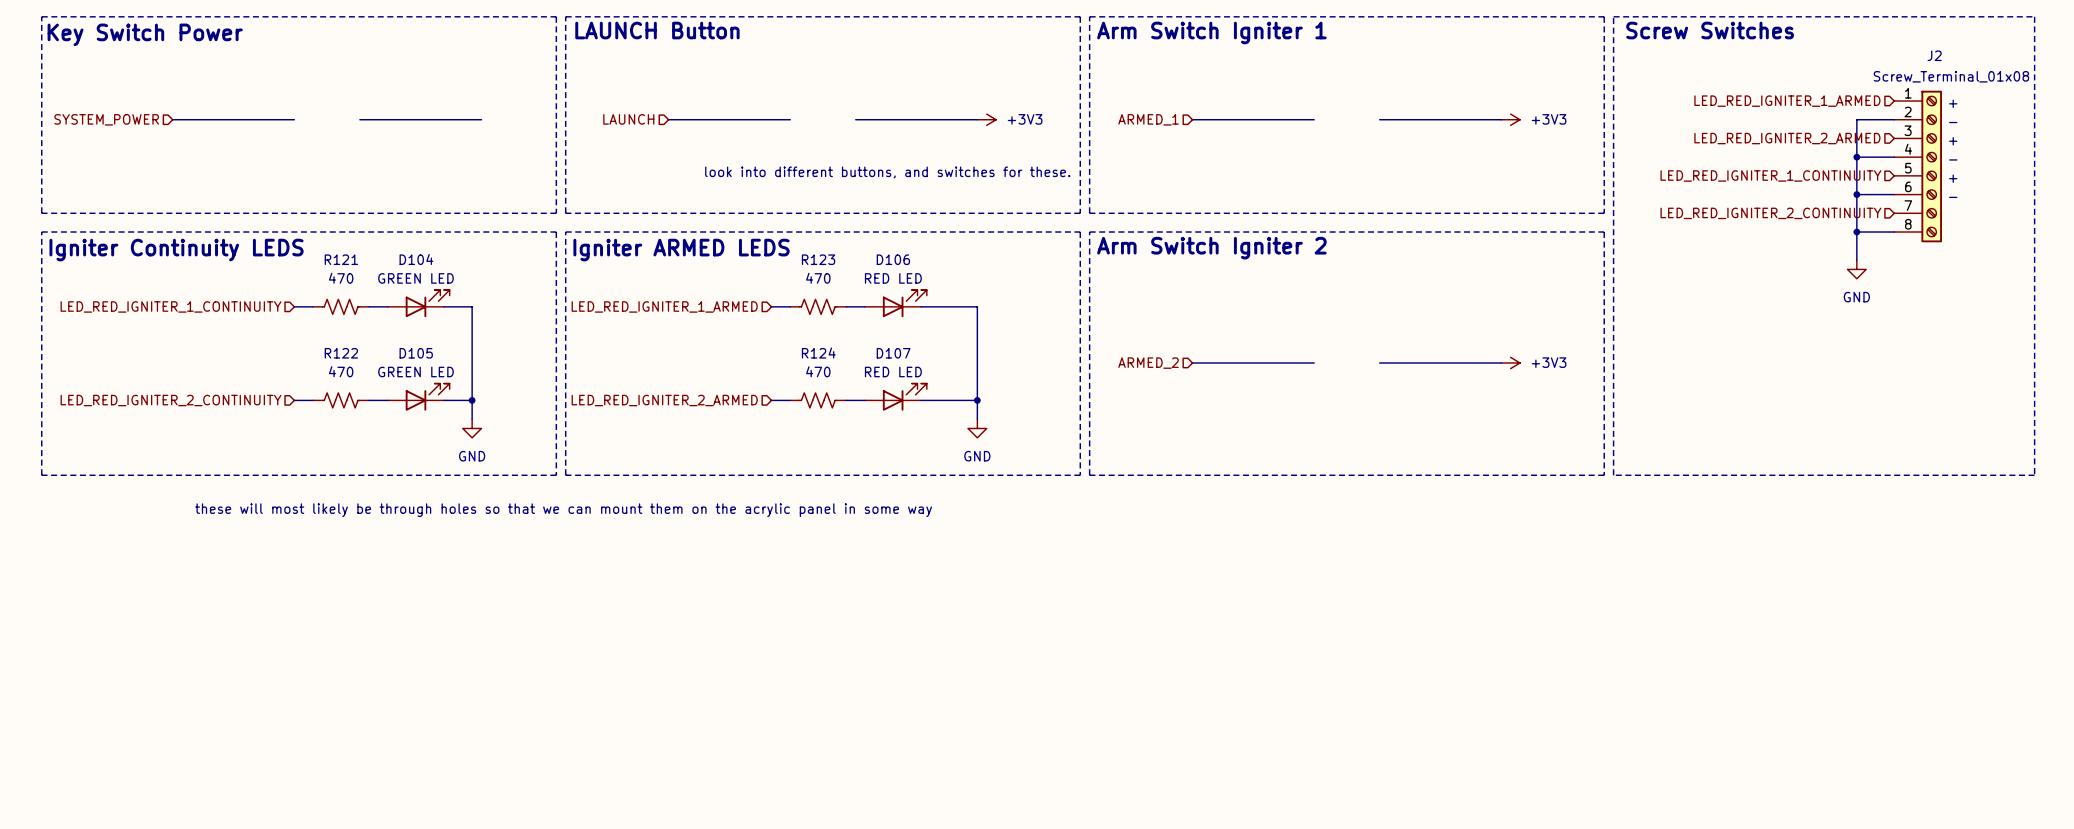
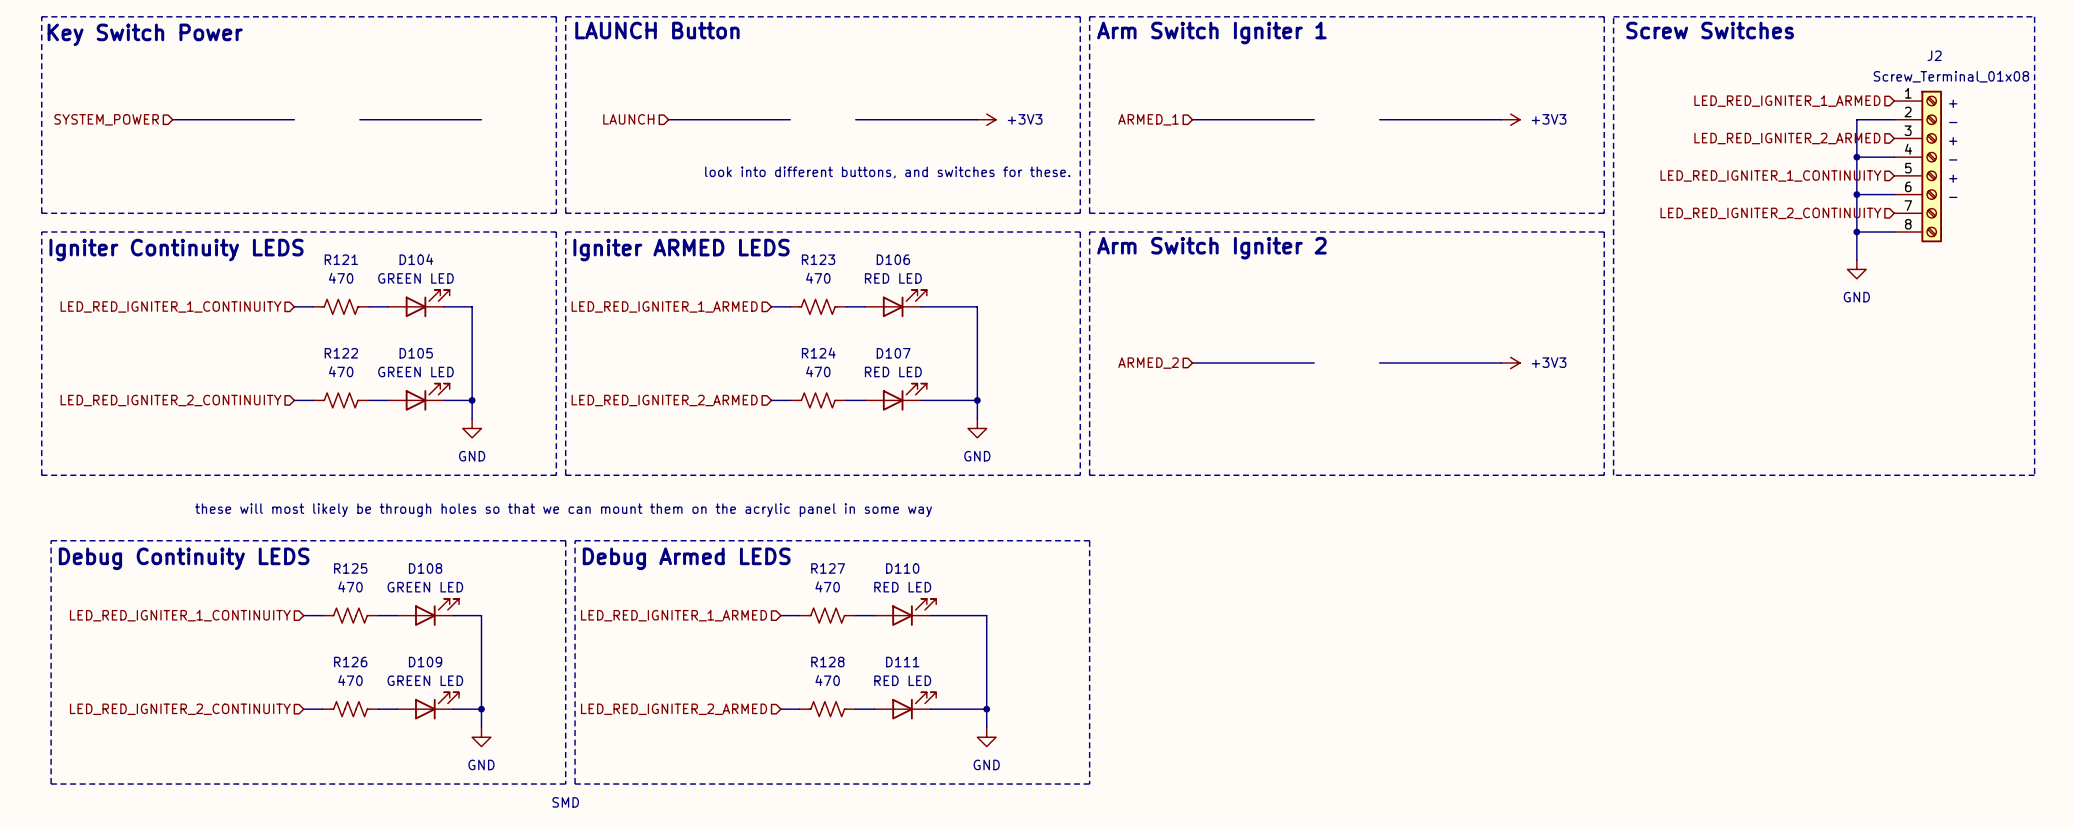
line: none -> (51, 540) (565, 540) (565, 784) (51, 784) (51, 540)
line: none -> (575, 540) (1089, 540) (1089, 784) (575, 784) (575, 540)
text: none -> Debug Continuity LEDS (184, 558)
text: none -> Debug Armed LEDS (686, 558)
D108: none -> GREEN LED (428, 612)
D110: none -> RED LED (905, 612)
hierarchical label: none -> LED_RED_IGNITER_1_CONTINUITY (180, 615)
wire: none -> (303, 615) (322, 615)
R125: none -> 470 (350, 615)
wire: none -> (378, 615) (397, 615)
wire: none -> (453, 615) (481, 615) (481, 727)
hierarchical label: none -> LED_RED_IGNITER_1_ARMED (674, 615)
wire: none -> (780, 615) (799, 615)
R127: none -> 470 (827, 615)
wire: none -> (855, 615) (874, 615)
wire: none -> (930, 615) (986, 615) (986, 727)
D109: none -> GREEN LED (428, 705)
D111: none -> RED LED (905, 705)
hierarchical label: none -> LED_RED_IGNITER_2_CONTINUITY (180, 709)
wire: none -> (303, 709) (322, 709)
R126: none -> 470 (350, 709)
wire: none -> (378, 709) (397, 709)
wire: none -> (453, 709) (481, 709)
junction: none -> (481, 709)
hierarchical label: none -> LED_RED_IGNITER_2_ARMED (674, 709)
wire: none -> (780, 709) (799, 709)
R128: none -> 470 (827, 709)
wire: none -> (855, 709) (874, 709)
wire: none -> (930, 709) (986, 709)
junction: none -> (986, 709)
power symbol: none -> GND (481, 737)
power symbol: none -> GND (986, 737)
text: none -> SMD (565, 802)

